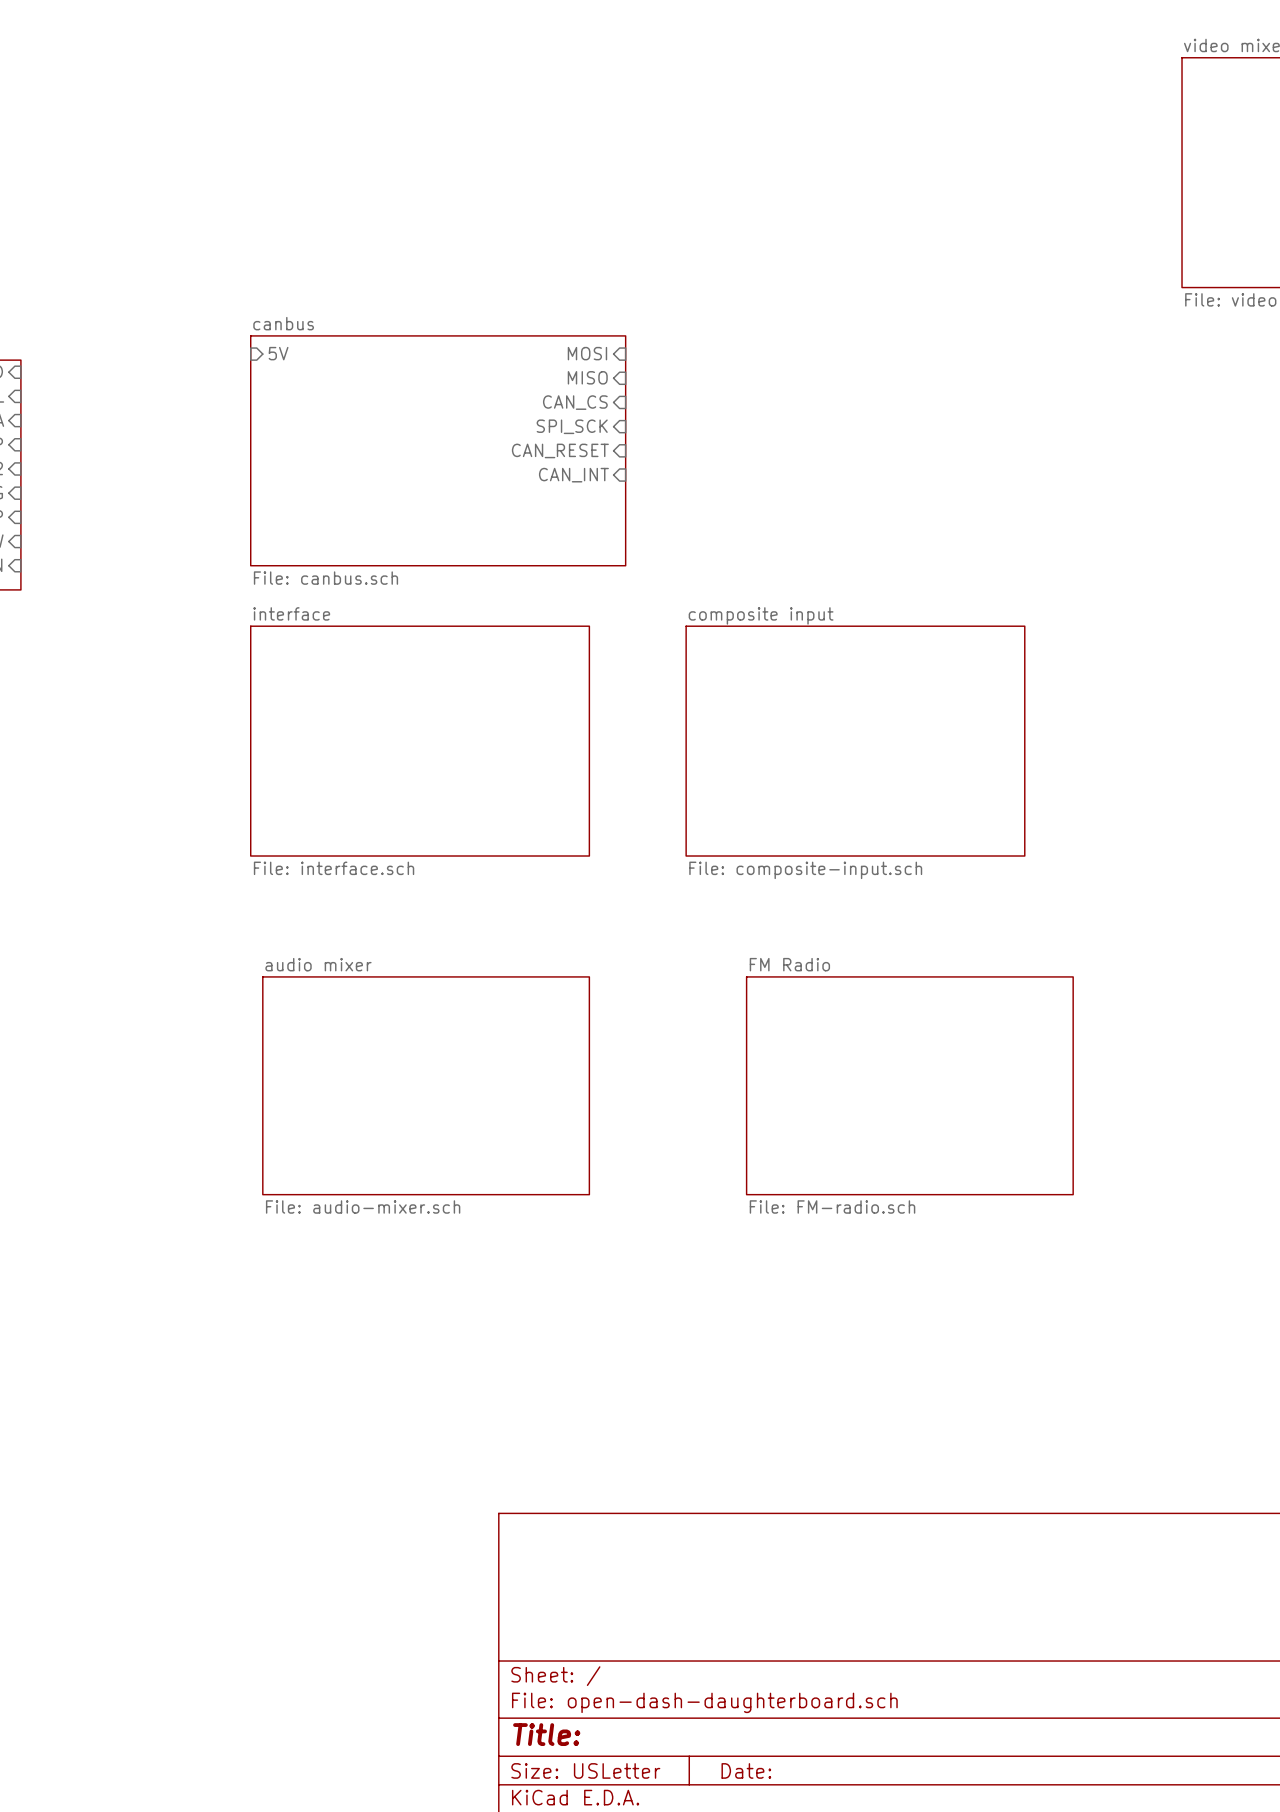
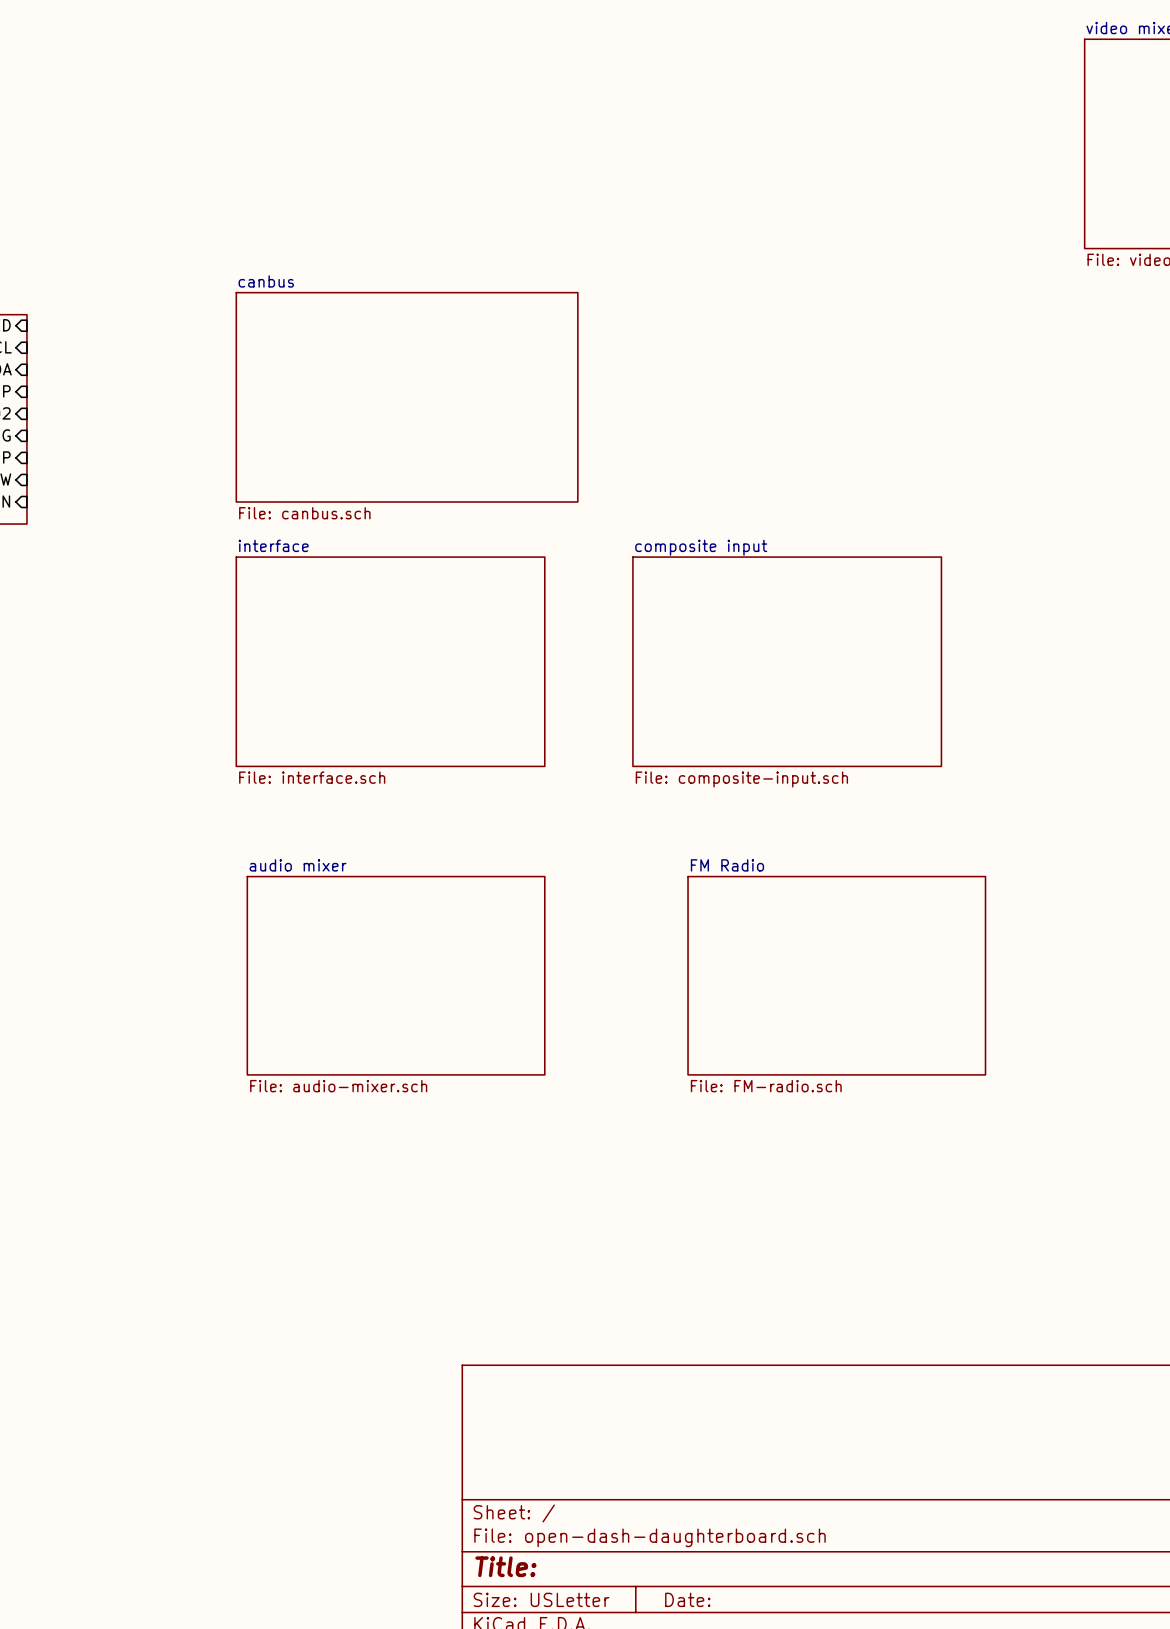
sheet pin: 5V (278, 353) -> none
sheet pin: MOSI (587, 353) -> none
sheet pin: MISO (587, 377) -> none
sheet pin: CAN_CS (575, 402) -> none
sheet pin: SPI_SCK (572, 426) -> none
sheet pin: CAN_RESET (560, 450) -> none
sheet pin: CAN_INT (573, 475) -> none

